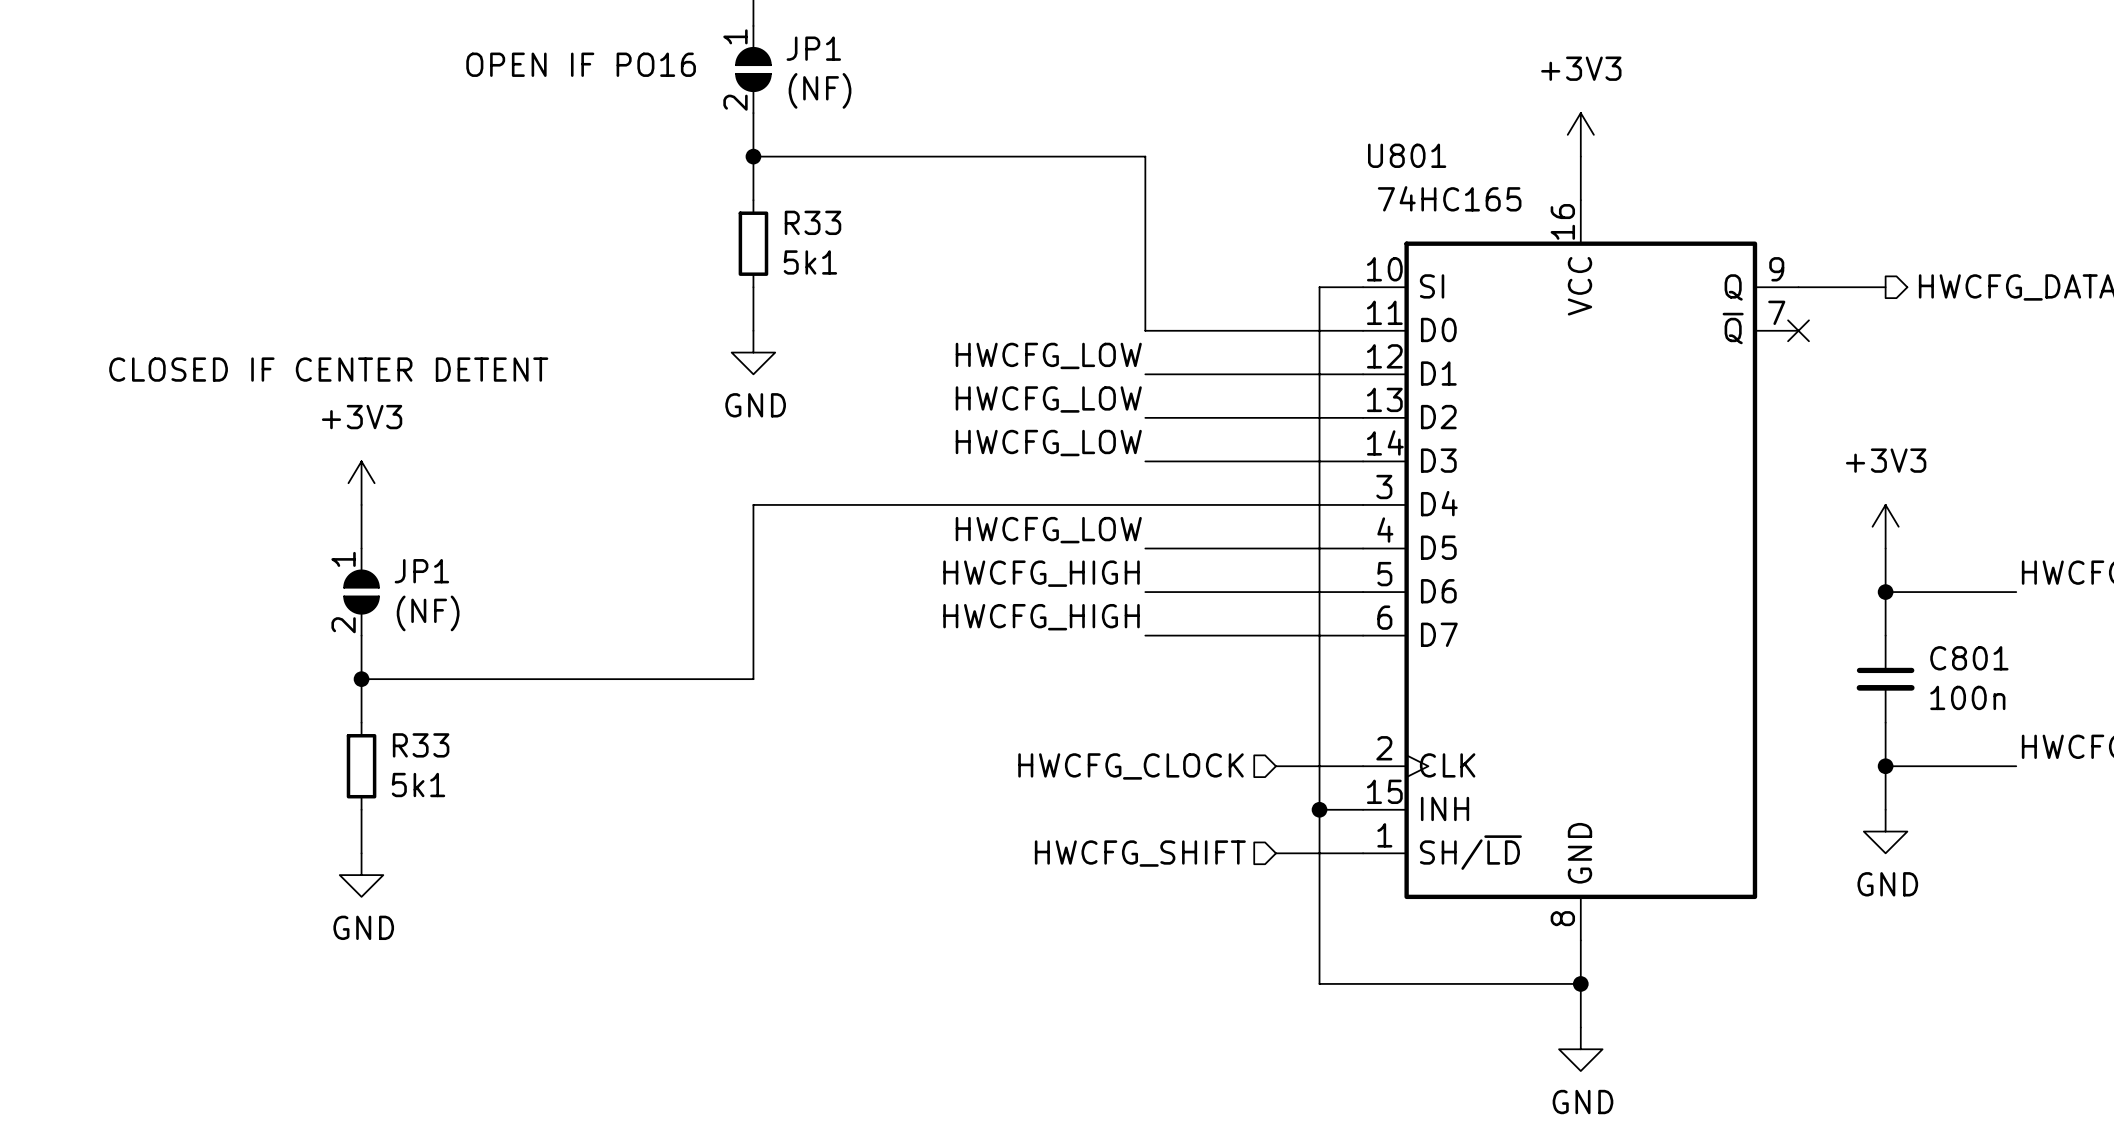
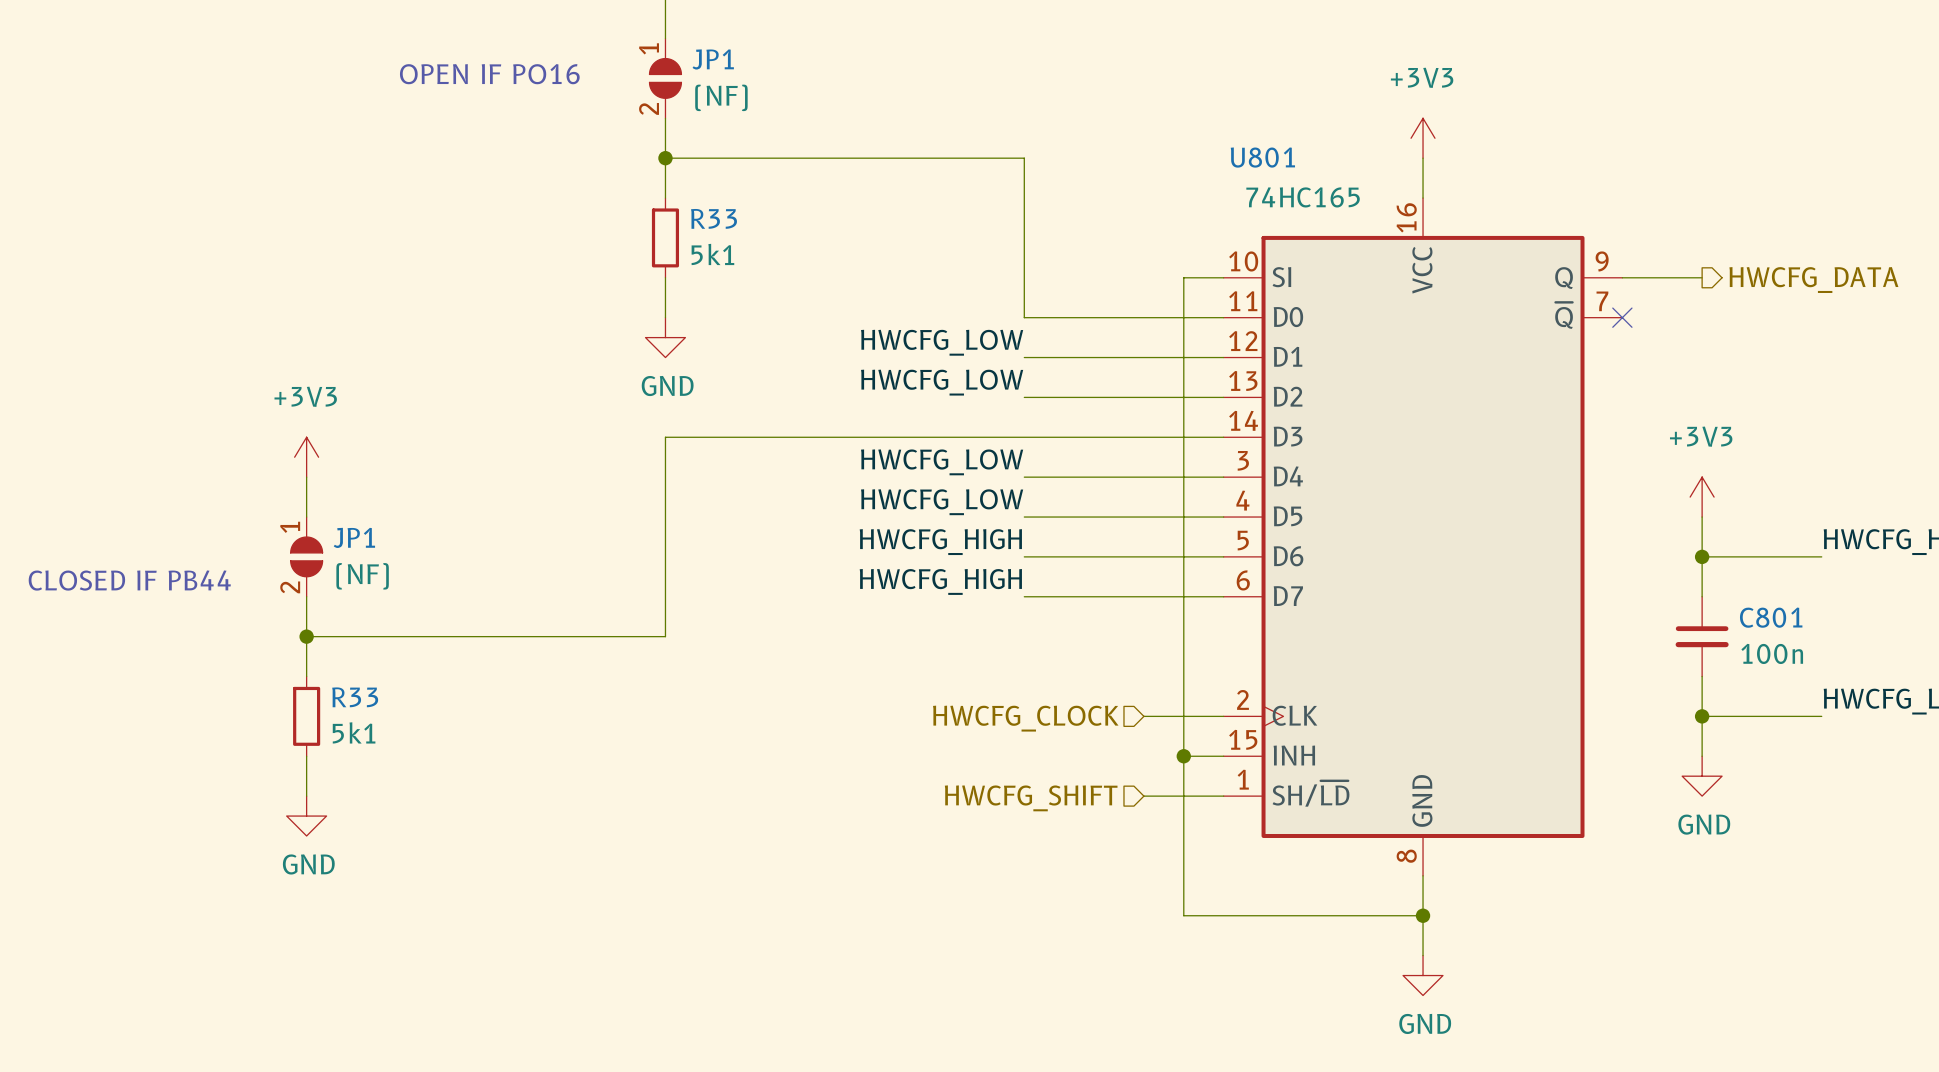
text: CLOSED IF CENTER DETENT (328, 369) -> none
label position: HWCFG_LOW (1048, 443) -> HWCFG_LOW (942, 462)
wire: (753, 504) (1145, 504) -> (665, 477) (665, 437) (1024, 437)
text: none -> CLOSED IF PB44 (129, 580)

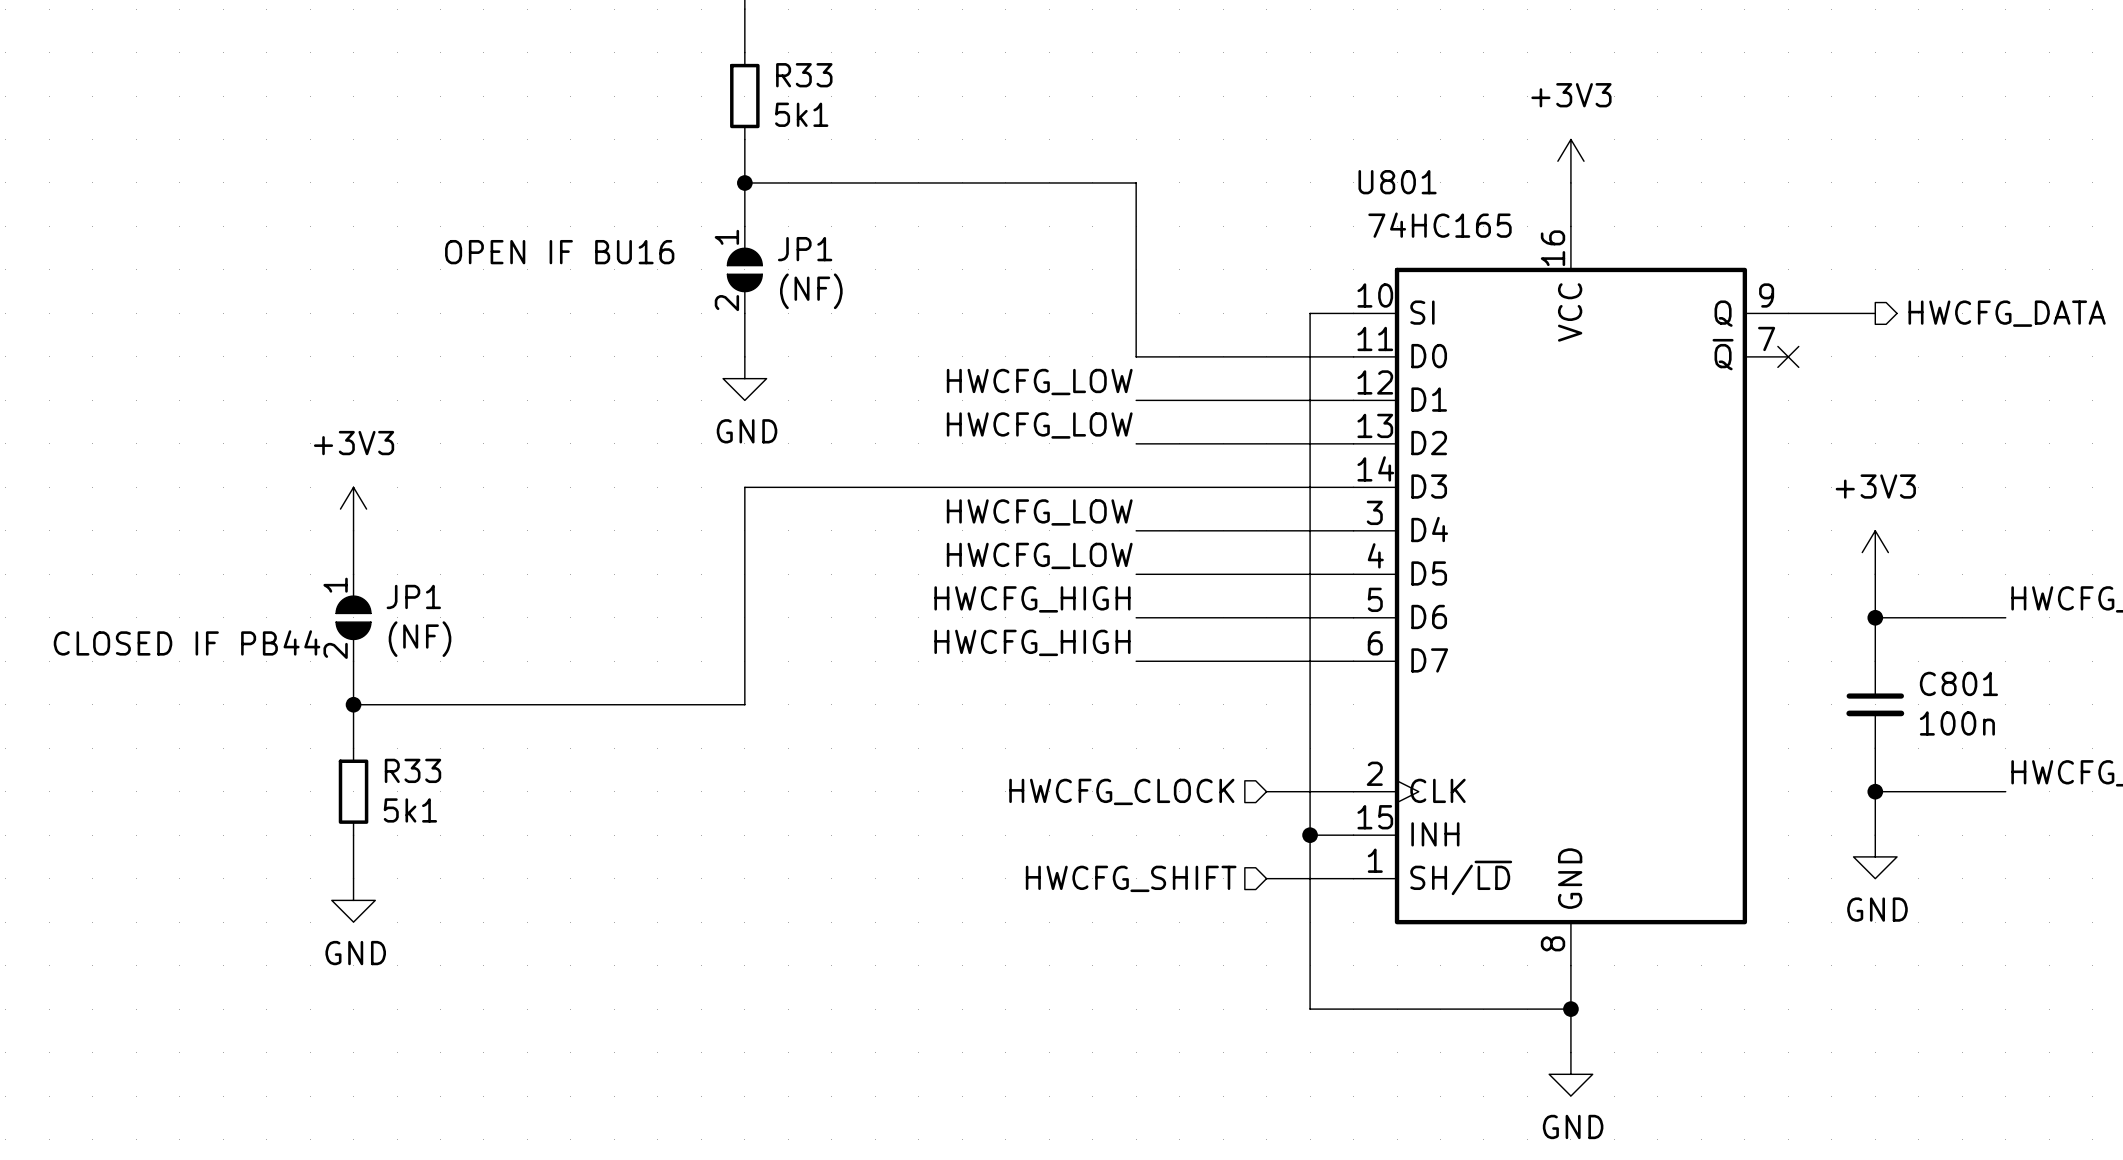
text: OPEN IF PO16 (489, 74) -> none
JP1 position: (665, 78) -> (744, 269)
text: none -> OPEN IF BU16 (559, 252)
R33 position: (665, 237) -> (744, 96)

